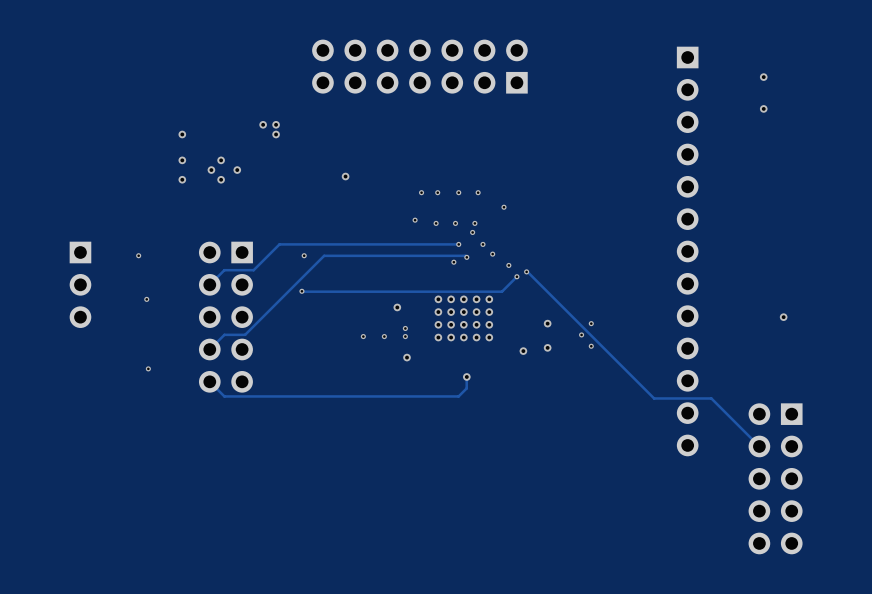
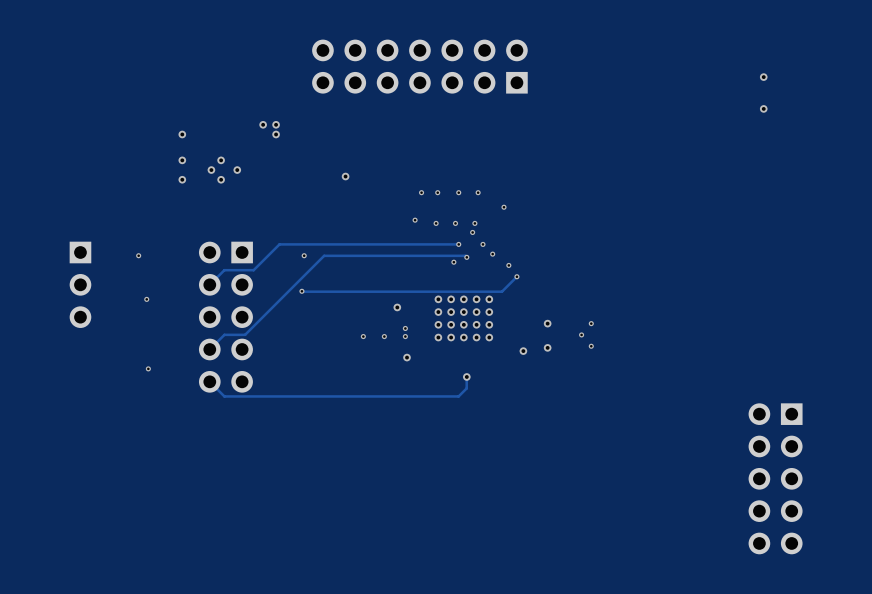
part: (687, 251) -> none
track: (526, 271) (654, 398) (711, 398) (759, 446) -> none
via: (526, 271) -> none
via: (783, 317) -> none

